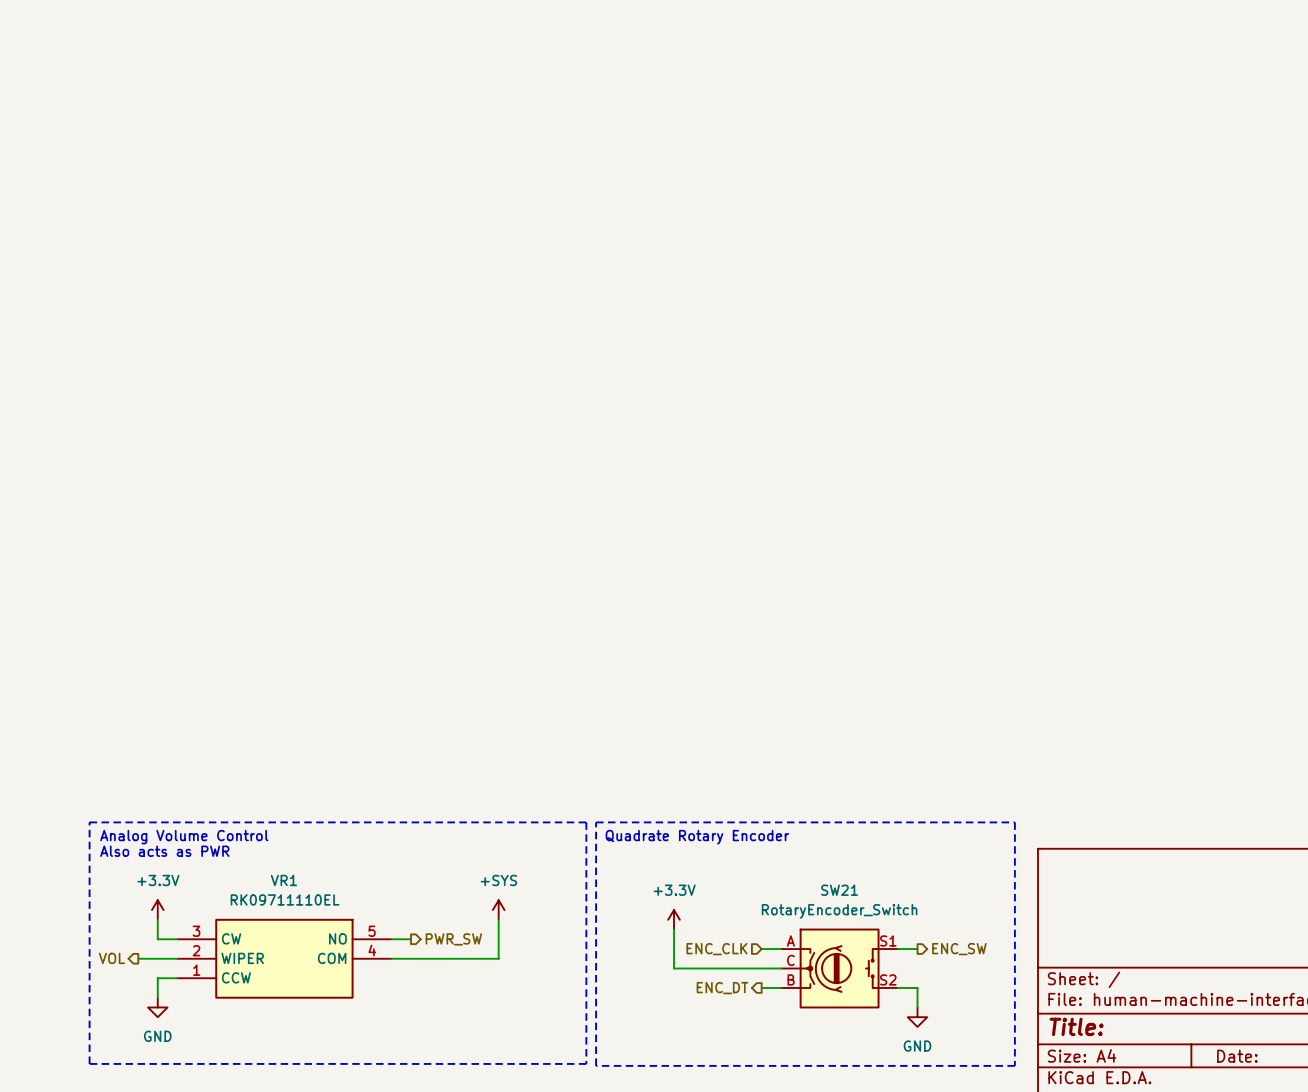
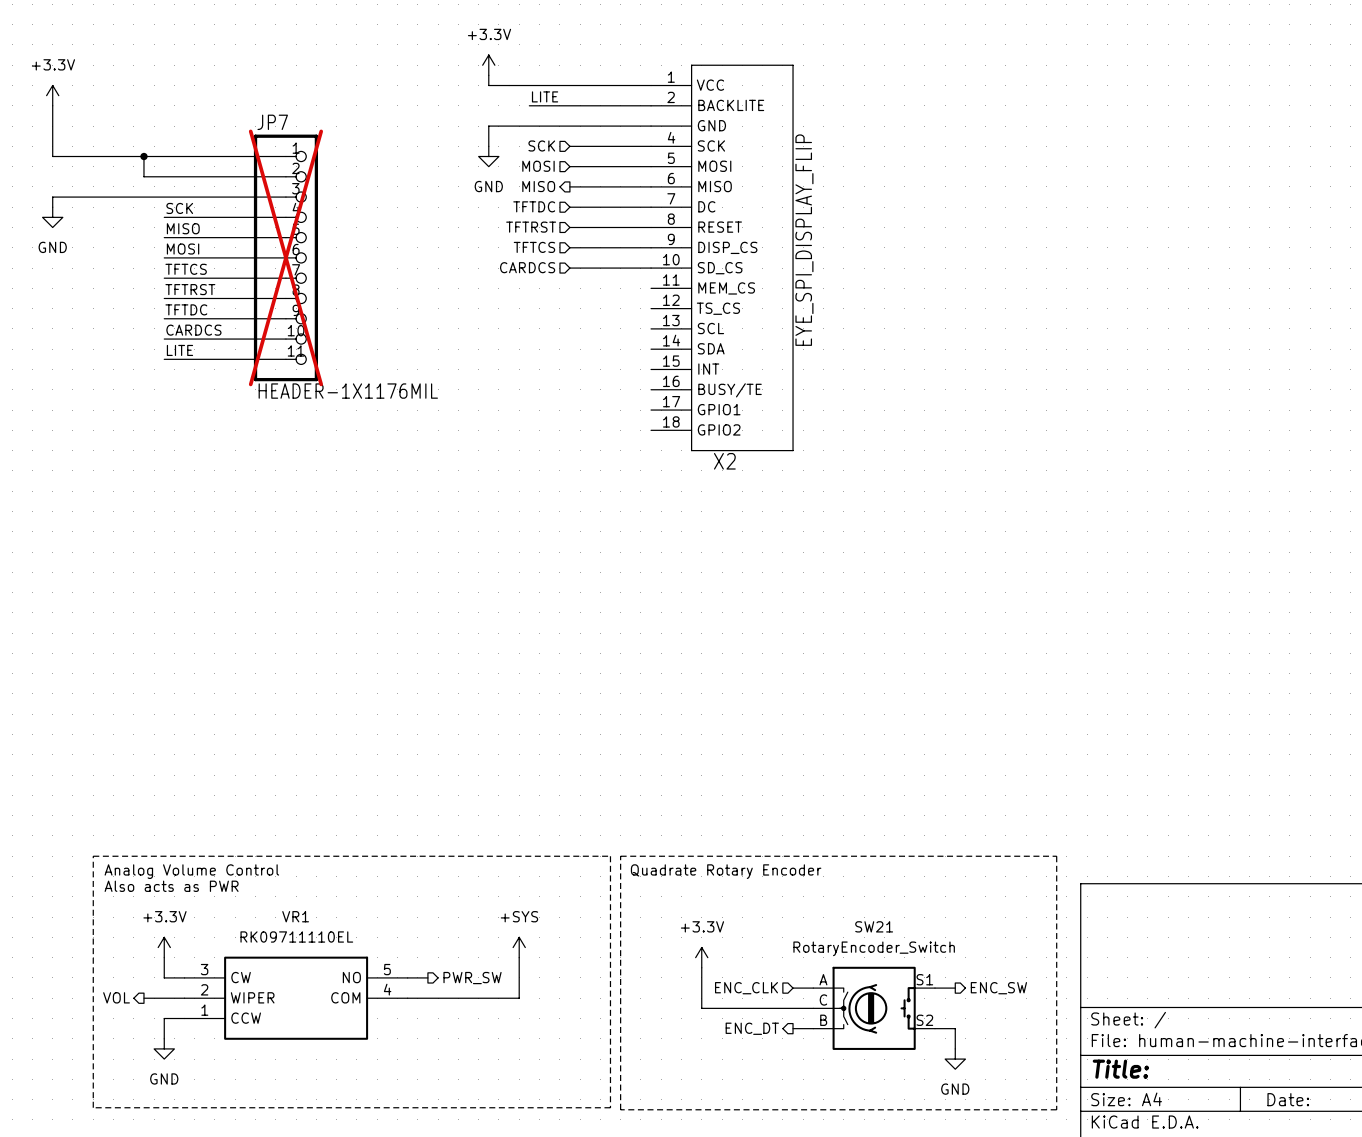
power symbol: none -> +3.3V (488, 65)
wire: none -> (488, 75) (488, 85) (651, 85)
power symbol: none -> +3.3V (52, 95)
label: none -> LITE (545, 96)
wire: none -> (52, 105) (52, 156) (285, 156)
wire: none -> (529, 105) (651, 105)
wire: none -> (651, 126) (488, 126) (488, 146)
hierarchical label: none -> SCK (541, 145)
wire: none -> (569, 146) (651, 146)
wire: none -> (143, 156) (143, 176) (285, 176)
junction: none -> (143, 156)
power symbol: none -> GND (488, 156)
hierarchical label: none -> MOSI (538, 166)
wire: none -> (569, 166) (651, 166)
hierarchical label: none -> MISO (538, 186)
wire: none -> (569, 186) (651, 186)
wire: none -> (285, 197) (52, 197) (52, 207)
hierarchical label: none -> TFTDC (534, 206)
wire: none -> (569, 207) (651, 207)
label: none -> SCK (179, 208)
power symbol: none -> GND (52, 217)
wire: none -> (164, 217) (285, 217)
hierarchical label: none -> TFTRST (531, 227)
wire: none -> (569, 227) (651, 227)
label: none -> MISO (183, 228)
wire: none -> (164, 237) (285, 237)
hierarchical label: none -> TFTCS (534, 247)
wire: none -> (569, 247) (651, 247)
label: none -> MOSI (183, 249)
wire: none -> (164, 257) (285, 257)
JP7: none -> HEADER-1X1176MIL (285, 257)
X2: none -> EYE_SPI_DISPLAY_FLIP (722, 257)
hierarchical label: none -> CARDCS (527, 267)
wire: none -> (569, 268) (651, 268)
label: none -> TFTCS (186, 269)
wire: none -> (164, 278) (285, 278)
label: none -> TFTRST (190, 289)
wire: none -> (164, 298) (285, 298)
label: none -> TFTDC (186, 309)
wire: none -> (164, 318) (285, 318)
label: none -> CARDCS (193, 330)
wire: none -> (164, 339) (285, 339)
label: none -> LITE (179, 350)
wire: none -> (164, 359) (285, 359)

